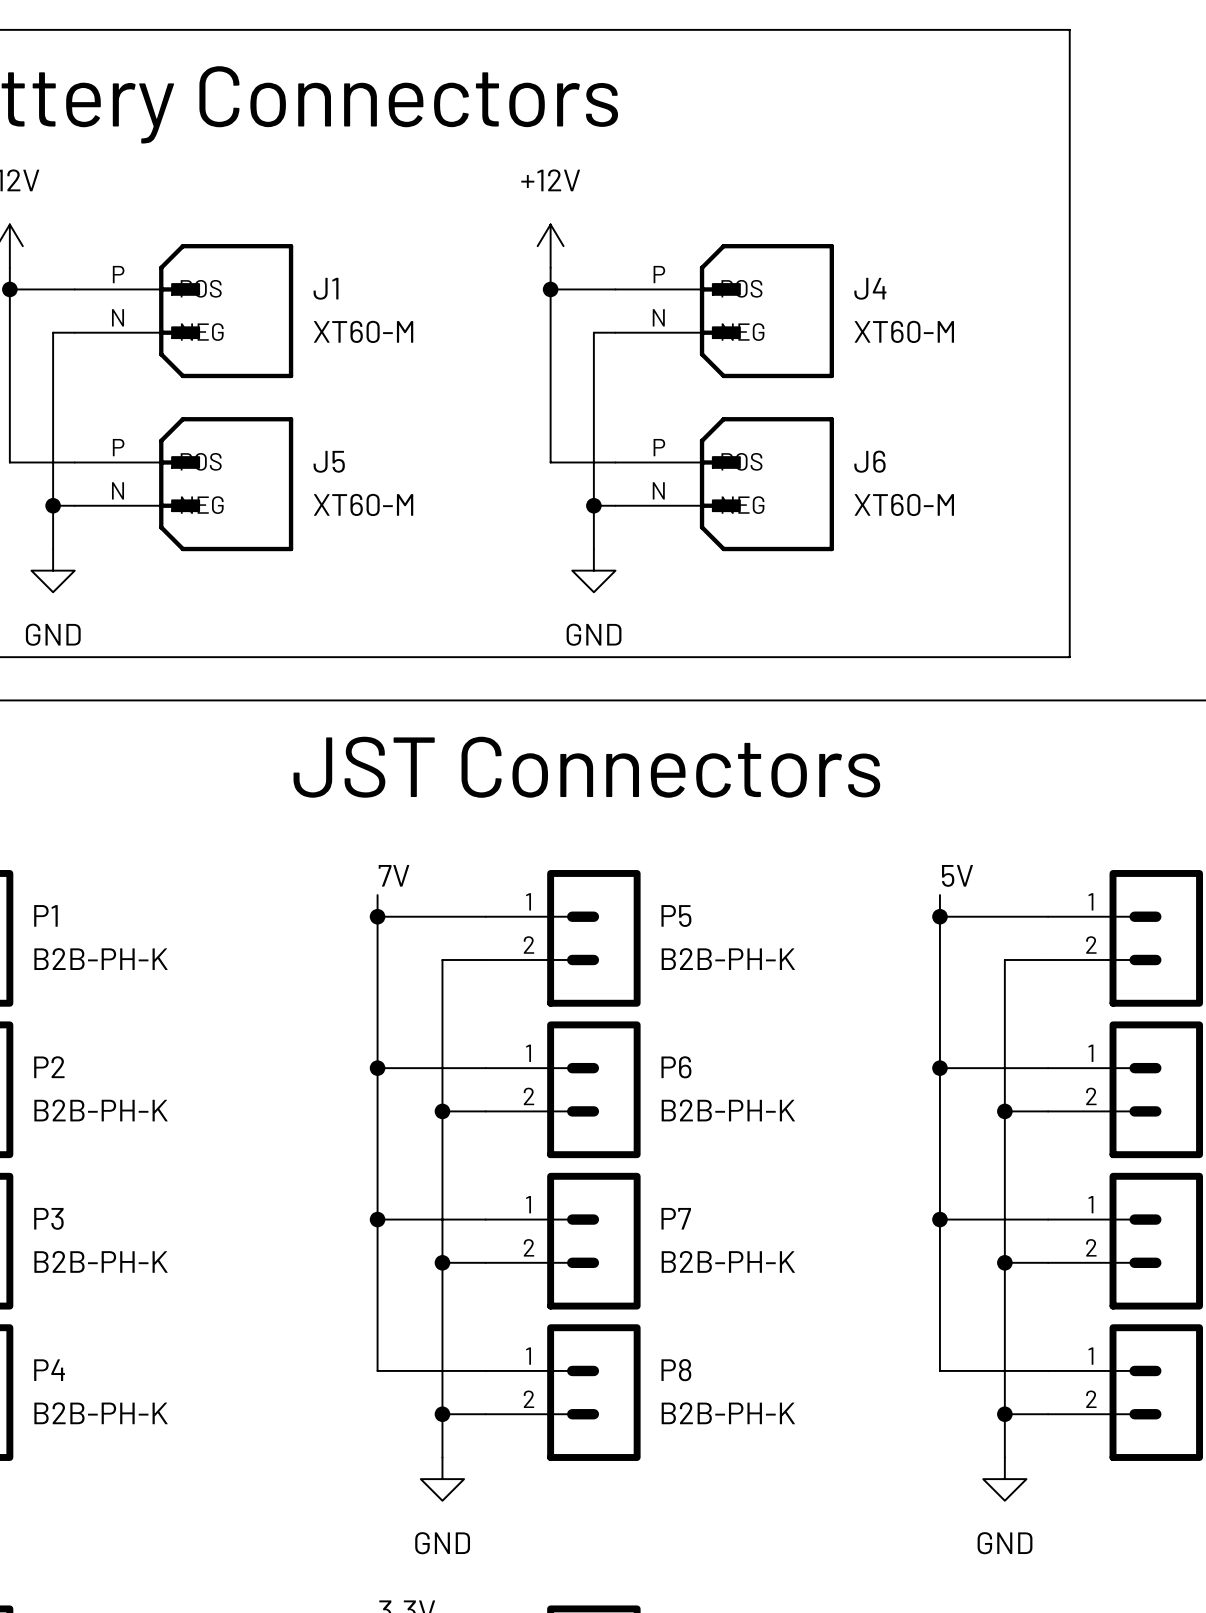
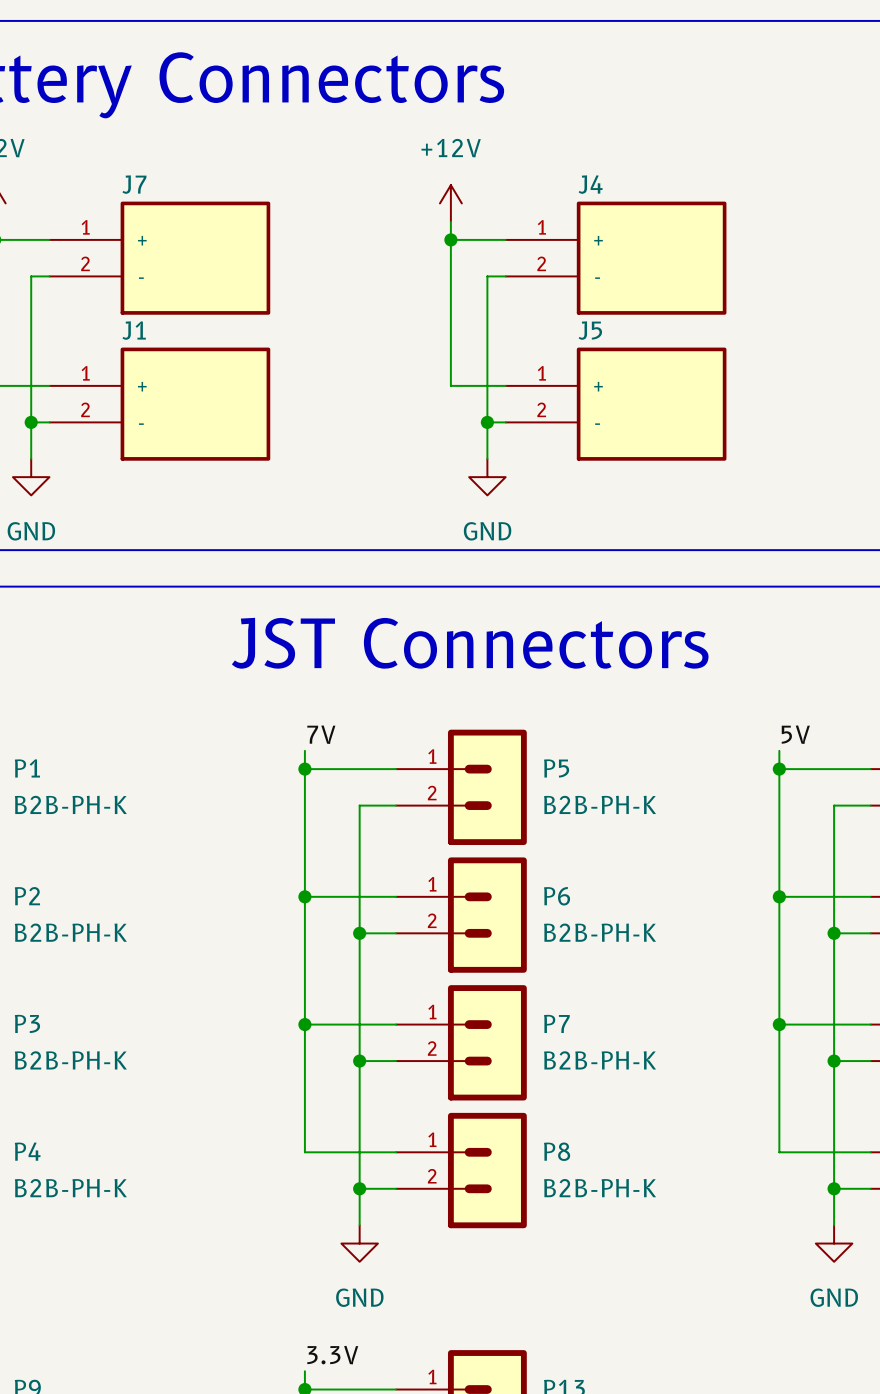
J1 symbol: [74, 244, 294, 379] -> [49, 347, 271, 461]
J4 symbol: [615, 244, 834, 379] -> [505, 201, 727, 315]
J1 name position: J1 (326, 288) -> J1 (134, 330)
J4 name position: J4 (870, 288) -> J4 (590, 184)
J7: none -> (159, 258)
J1 value: XT60-M (363, 331) -> none
J4 value: XT60-M (904, 331) -> none
J5 symbol: [74, 417, 294, 552] -> [505, 347, 727, 461]
J5 name position: J5 (329, 461) -> J5 (590, 330)
J6: XT60-M (724, 484) -> none
J5 value: XT60-M (363, 504) -> none

